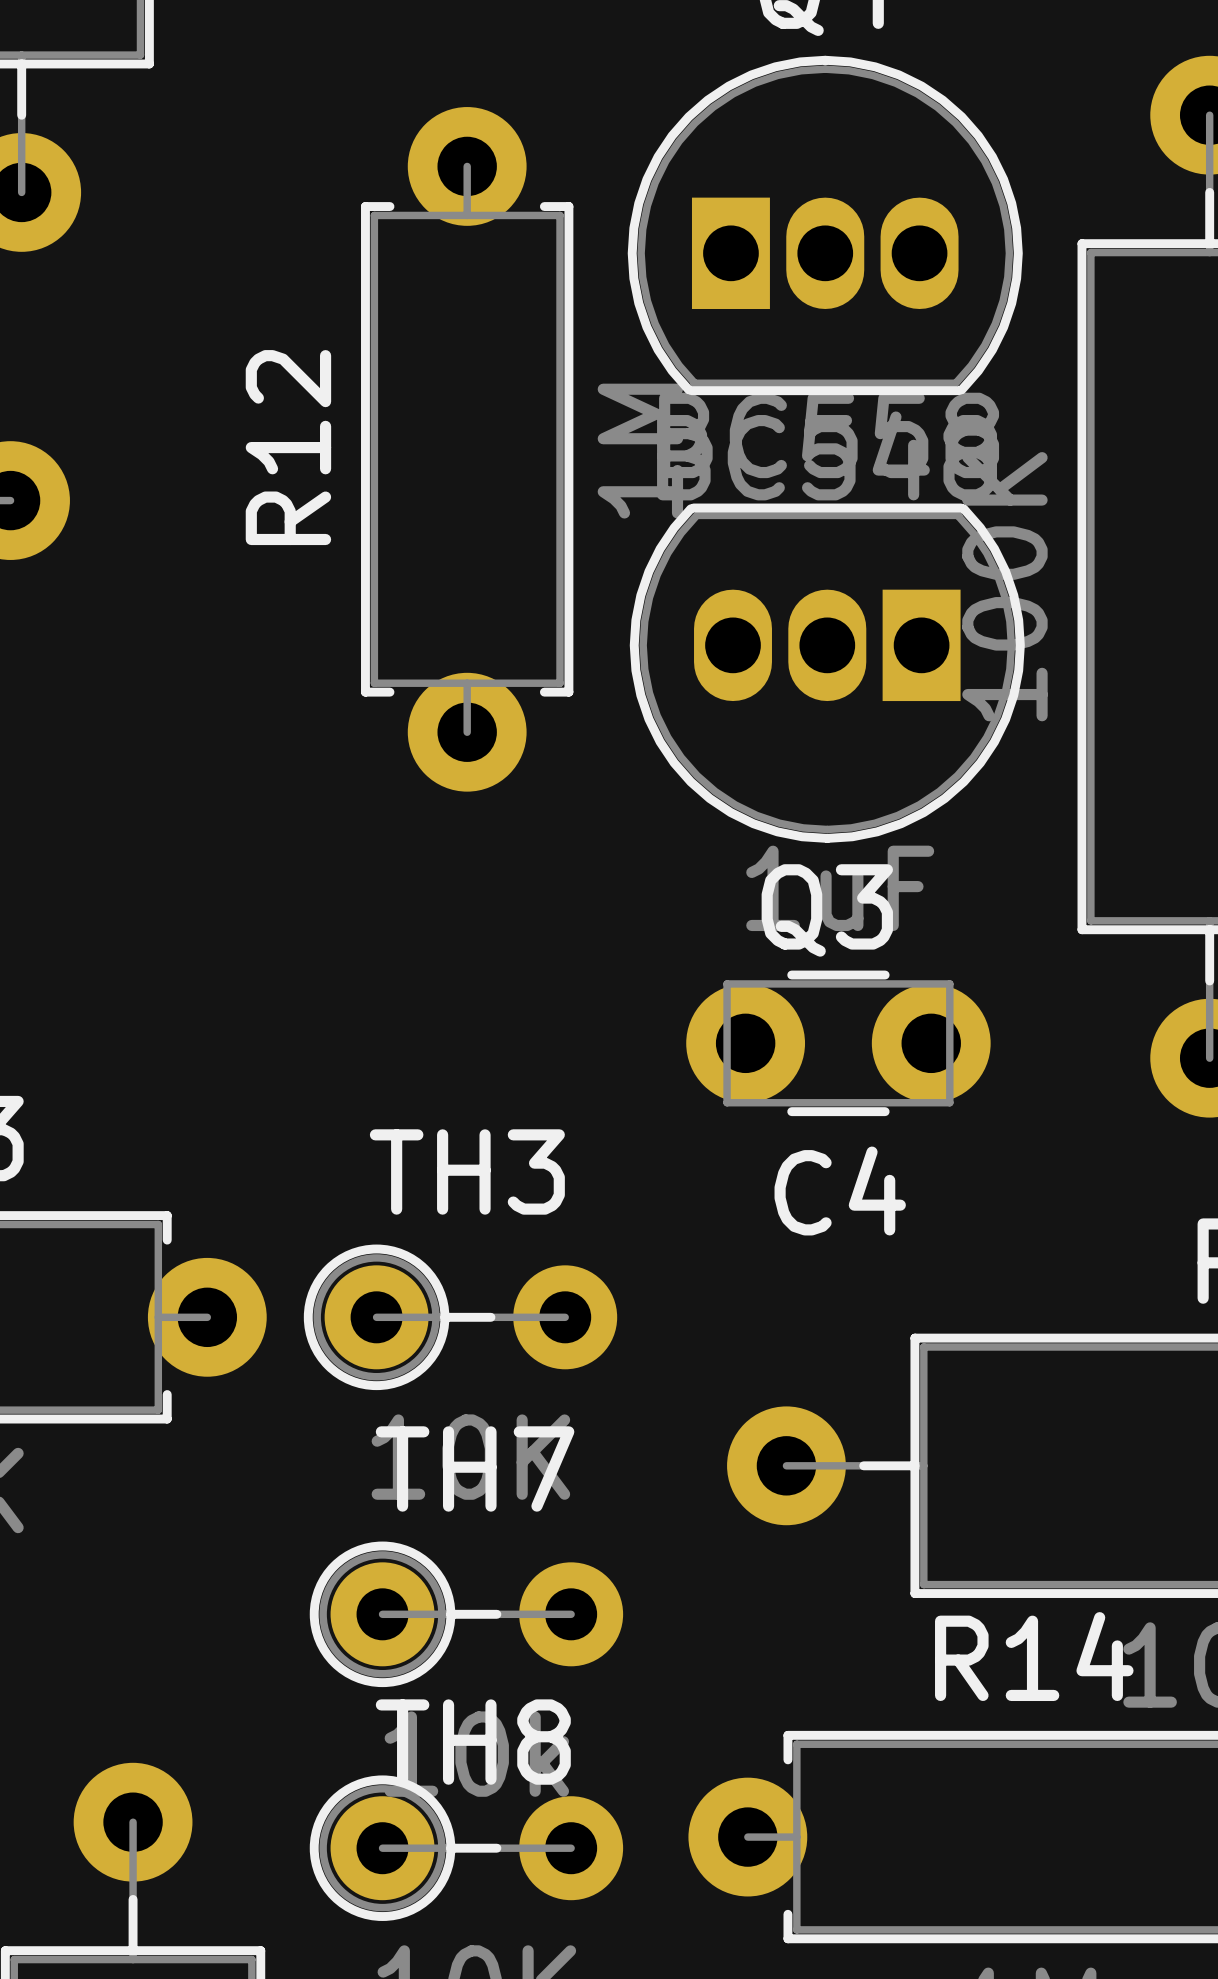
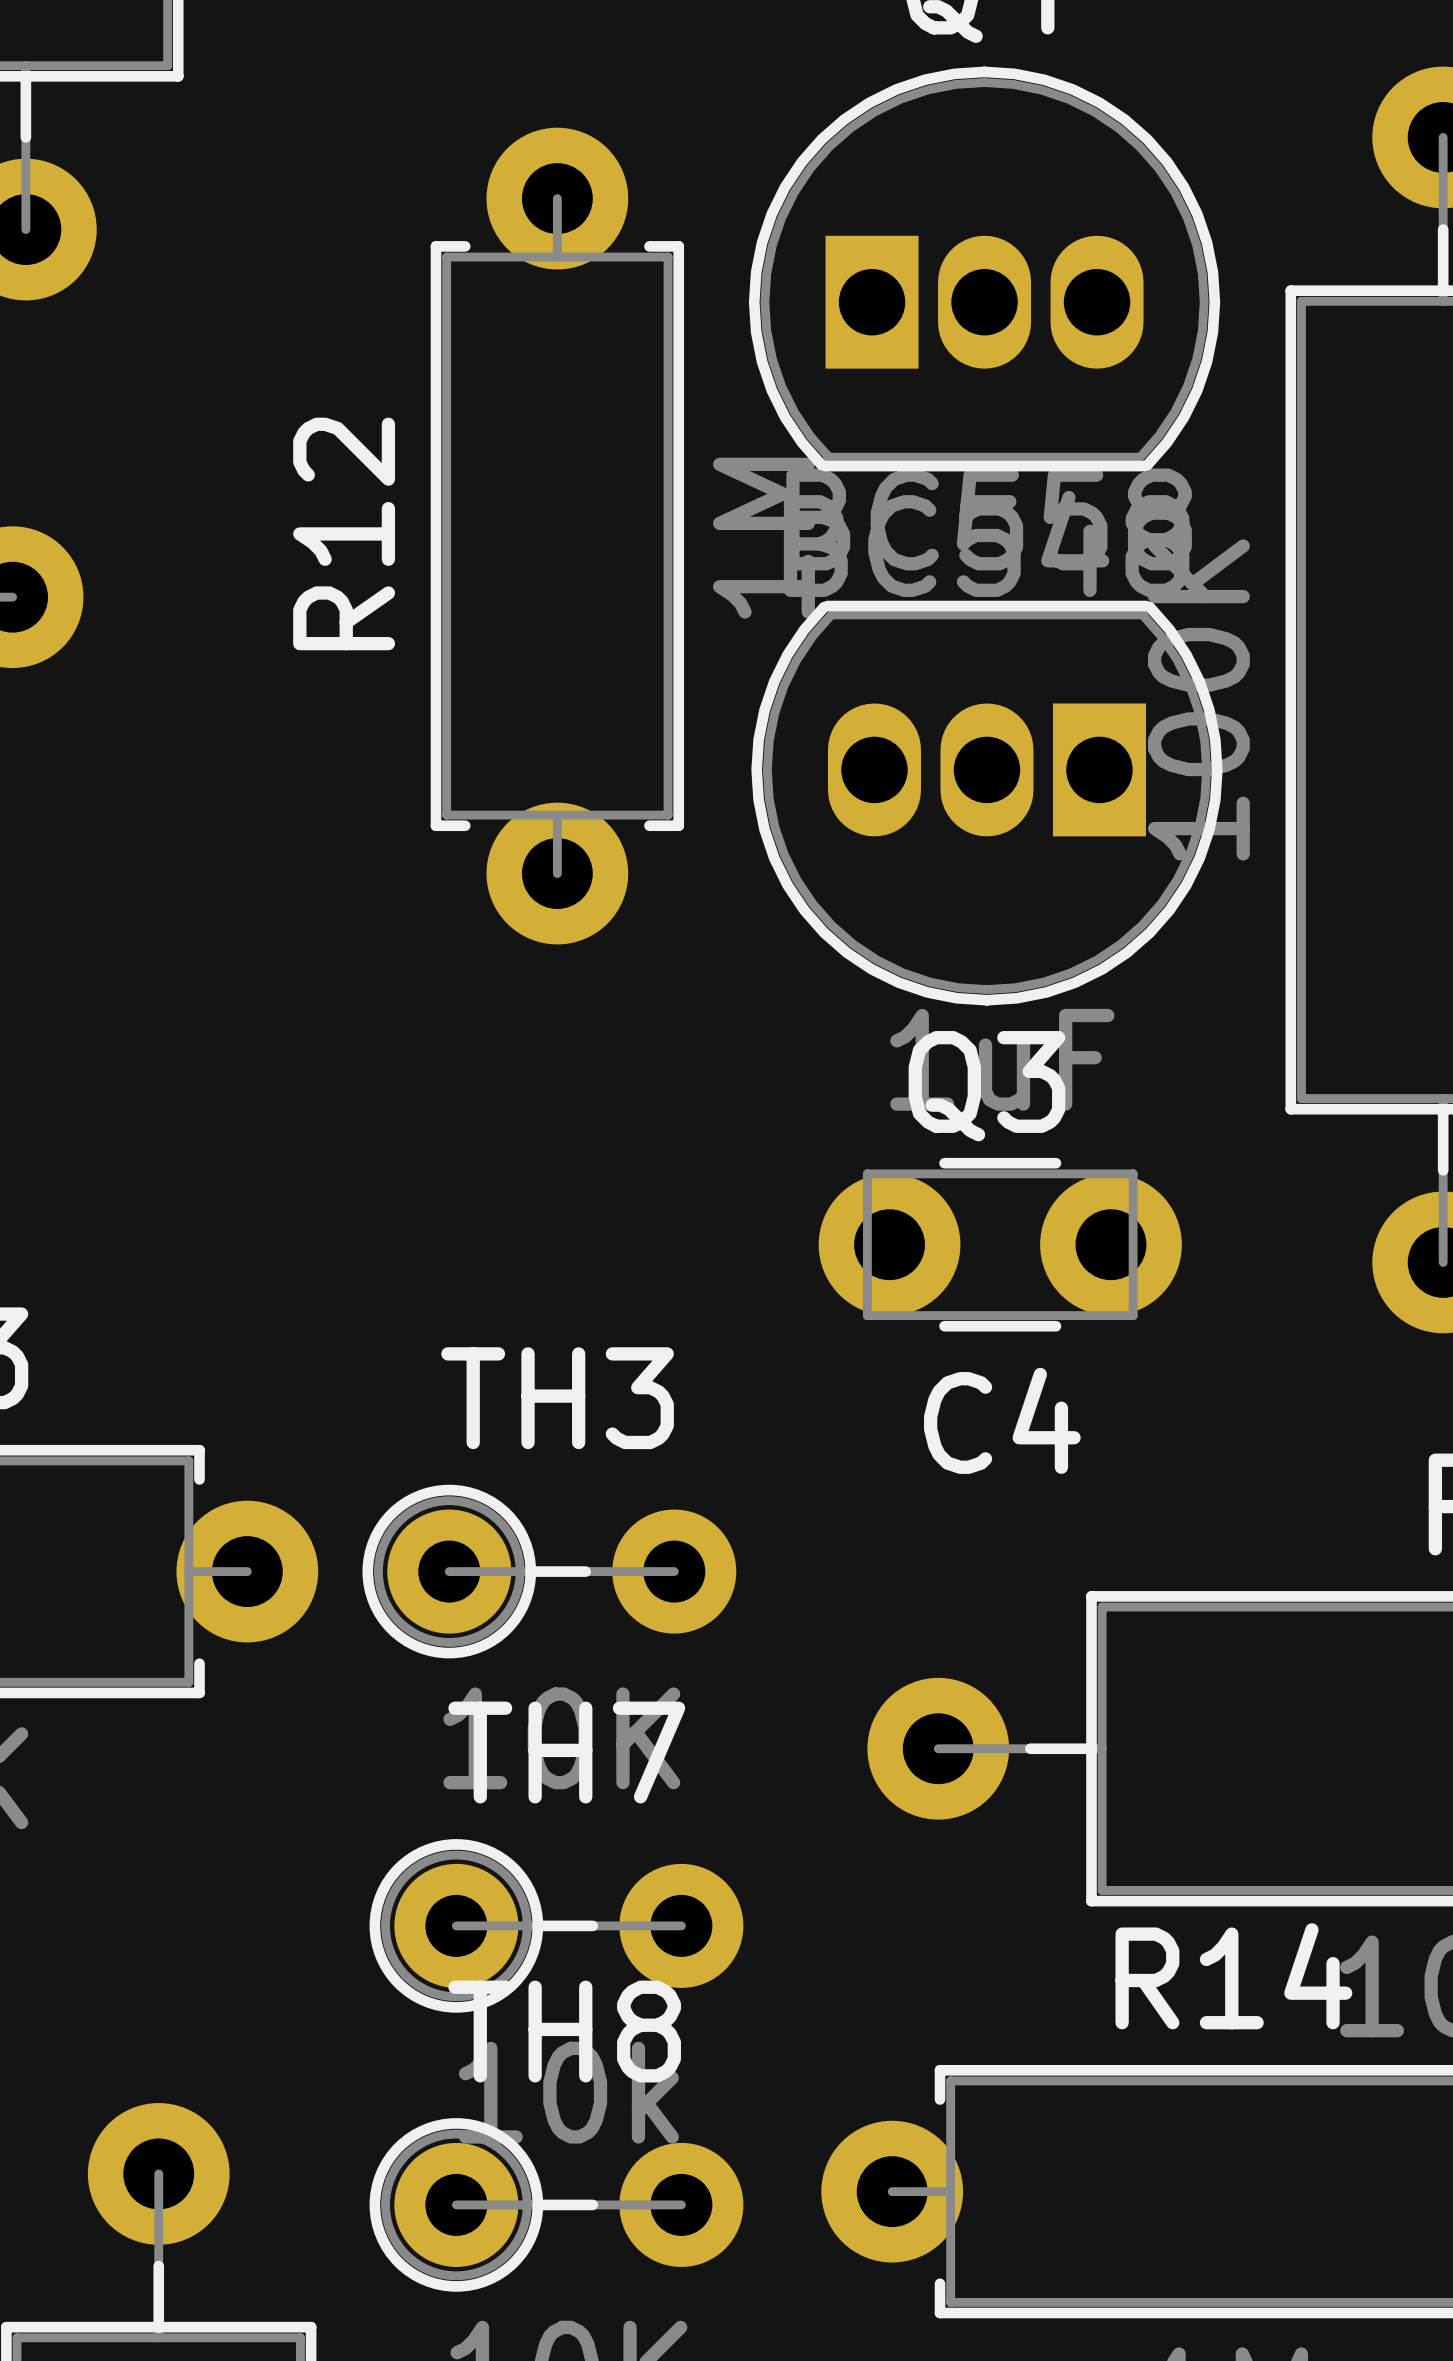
TH8 name position: TH8 (473, 1742) -> TH8 (564, 2031)

